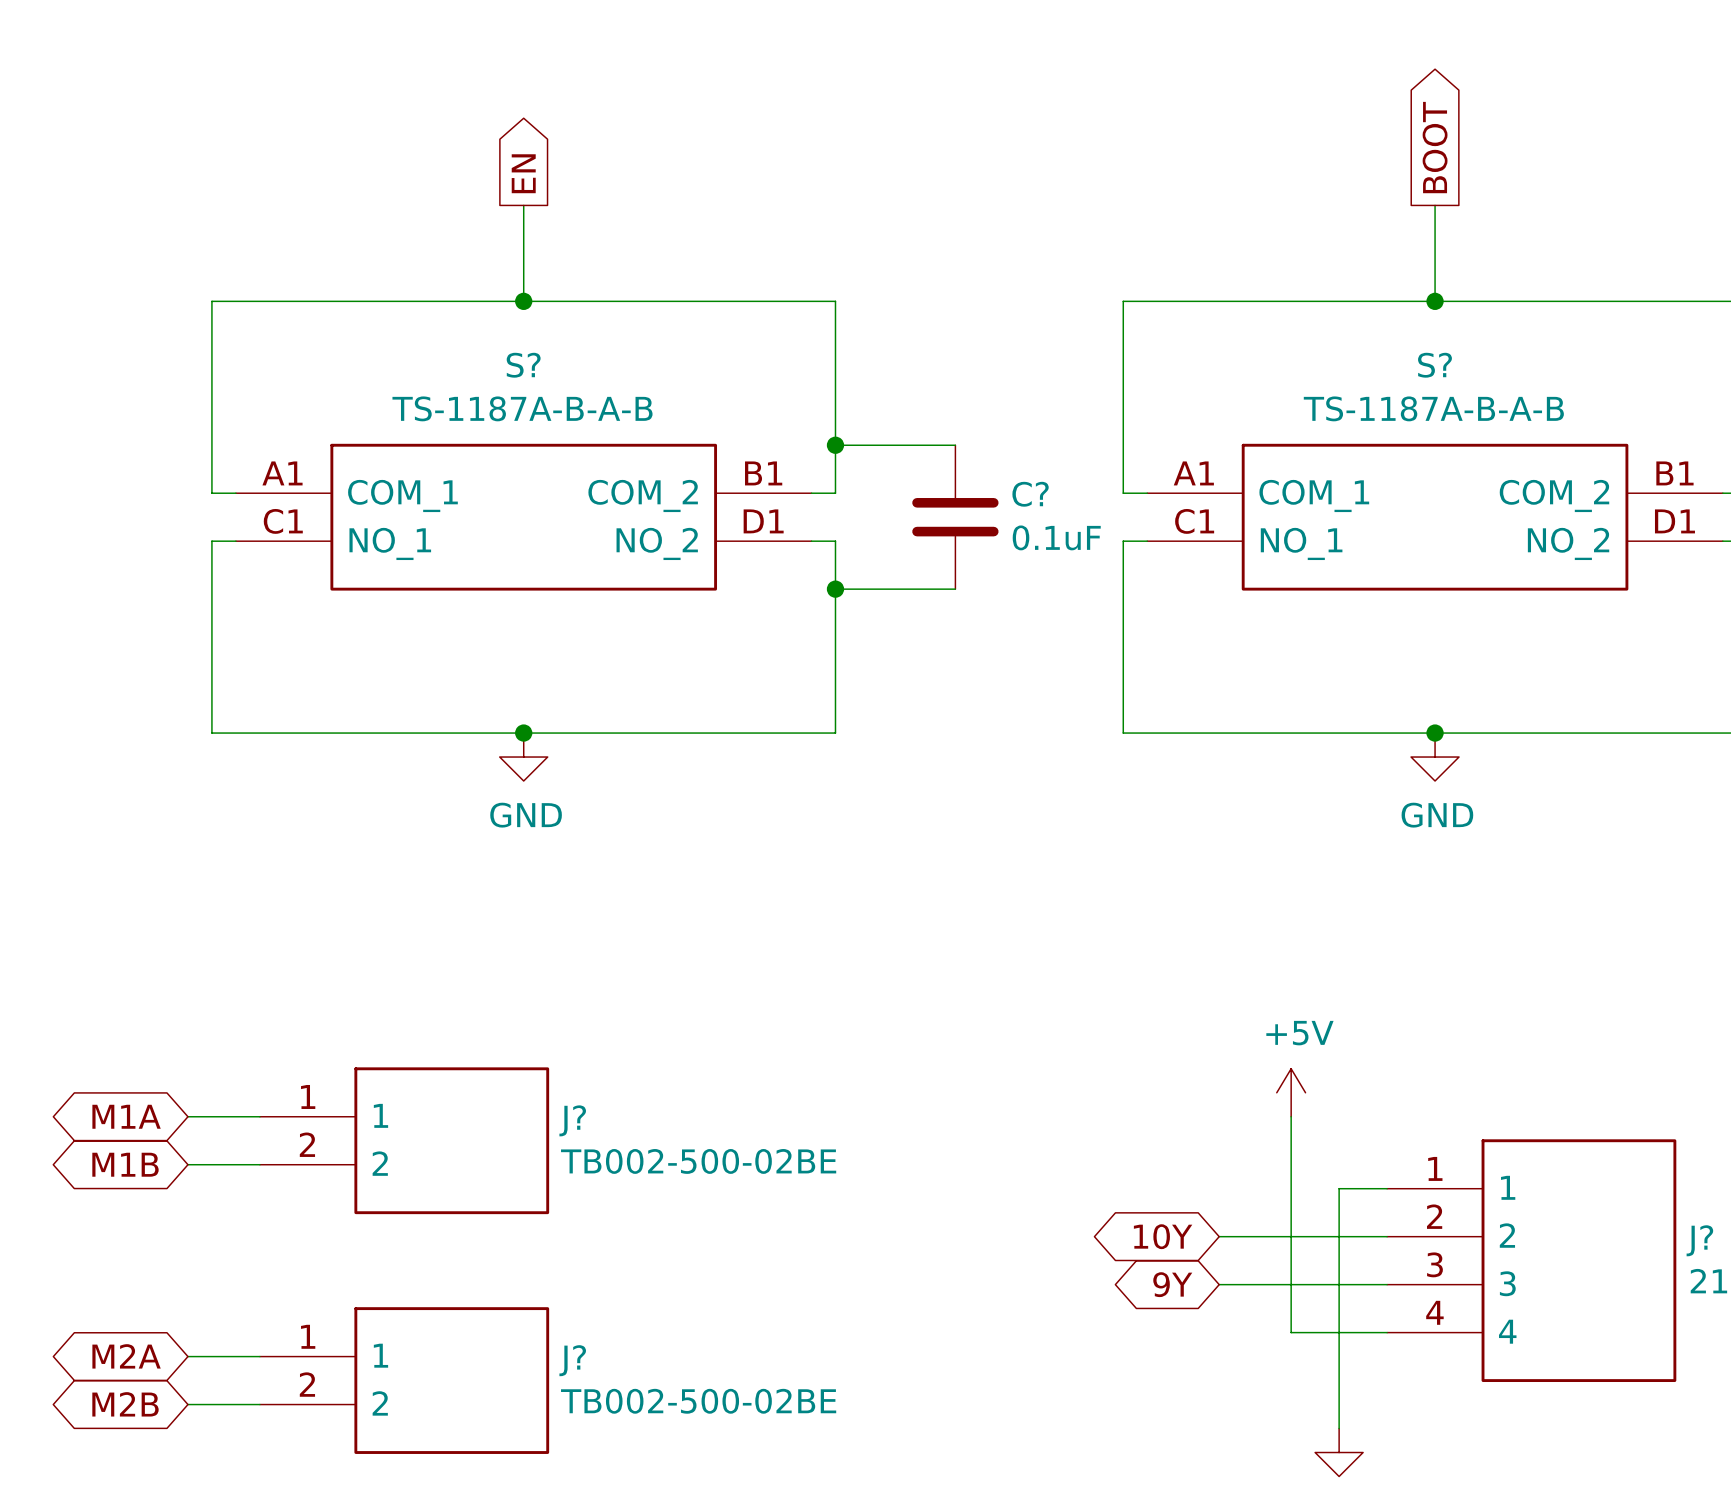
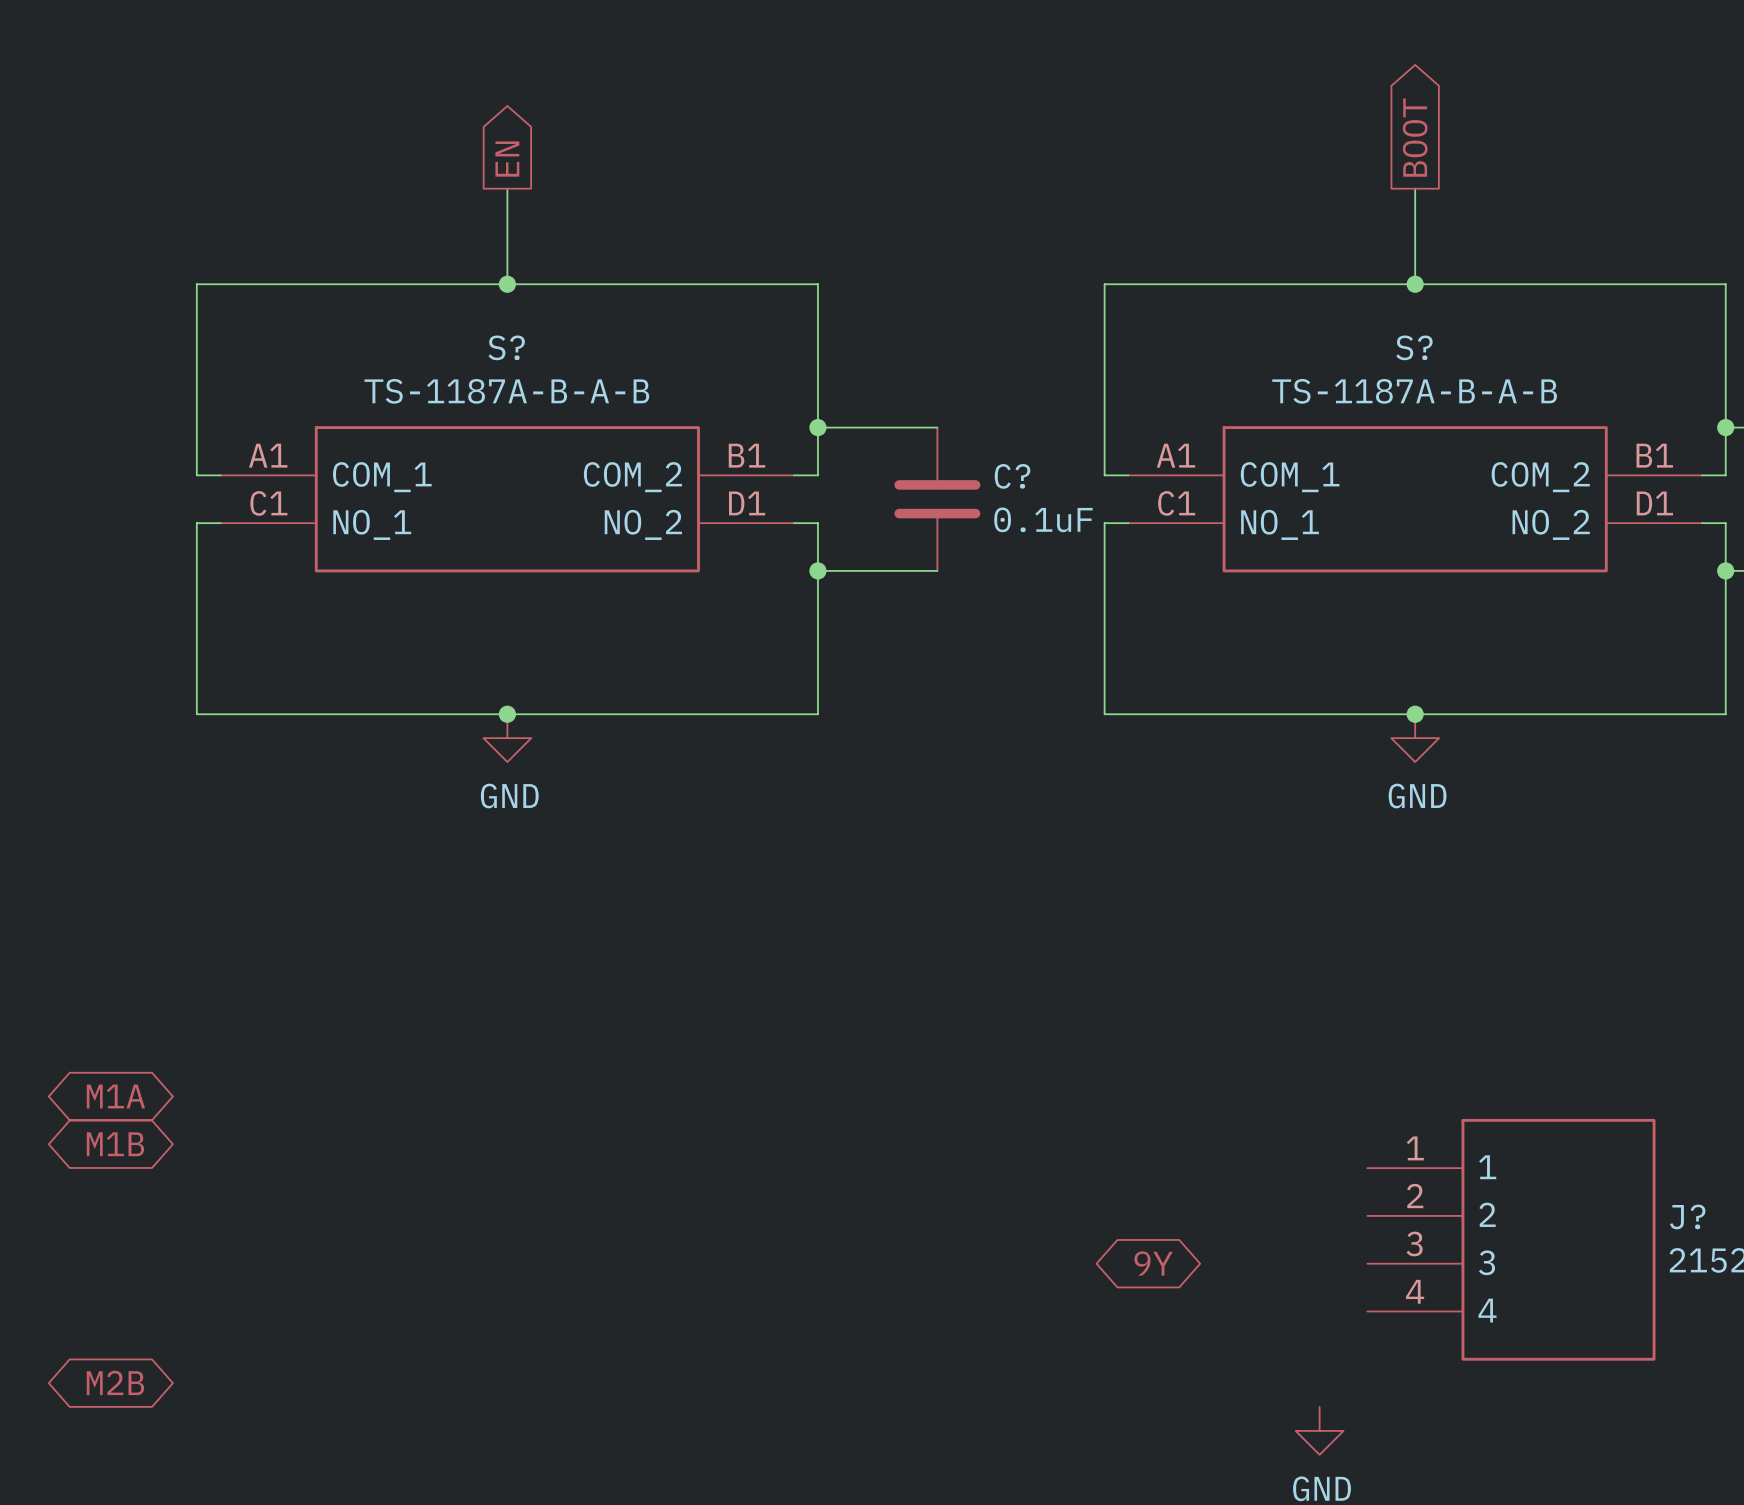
power symbol: +5V (1291, 1092) -> none
wire: (187, 1116) (259, 1116) -> none
wire: (1291, 1116) (1291, 1332) (1387, 1332) -> none
J?: TB002-500-02BE (404, 1140) -> none
wire: (187, 1164) (259, 1164) -> none
wire: (1387, 1188) (1339, 1188) (1339, 1428) -> none
global label: 10Y (1163, 1236) -> none
wire: (1219, 1236) (1387, 1236) -> none
wire: (1219, 1284) (1387, 1284) -> none
global label: M2A (126, 1356) -> none
wire: (187, 1356) (259, 1356) -> none
J?: TB002-500-02BE (404, 1380) -> none
wire: (187, 1404) (259, 1404) -> none

